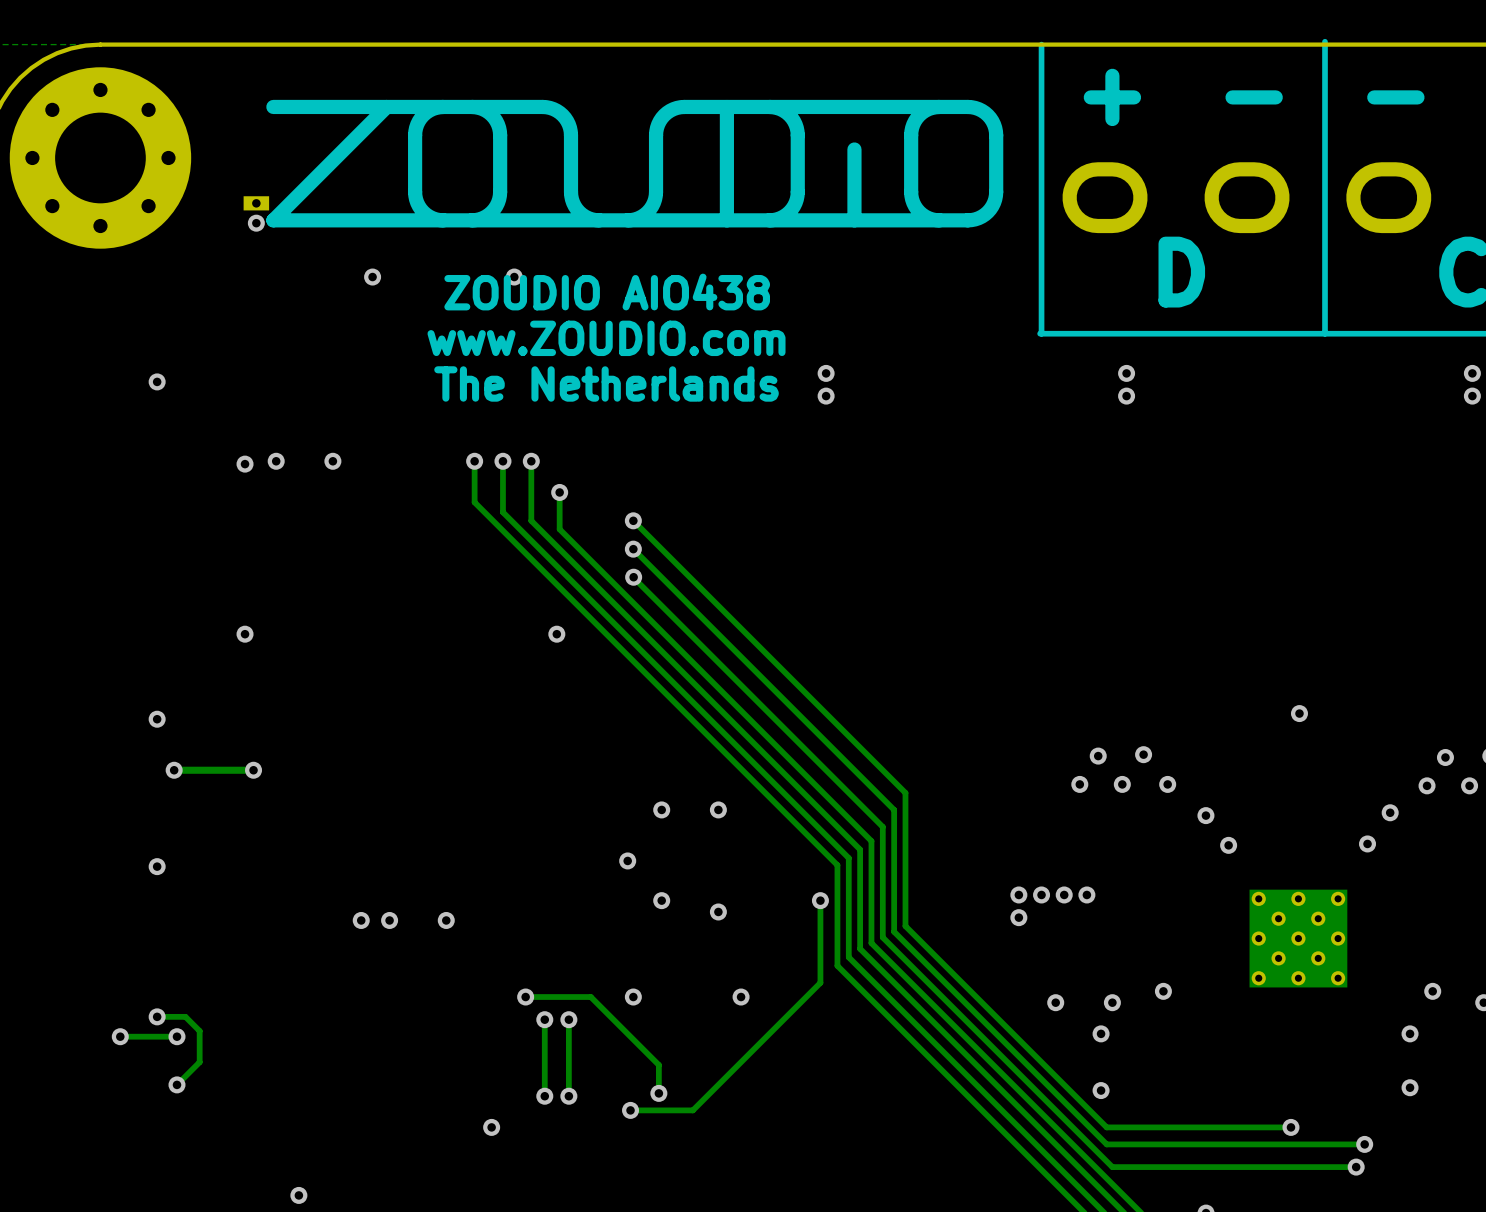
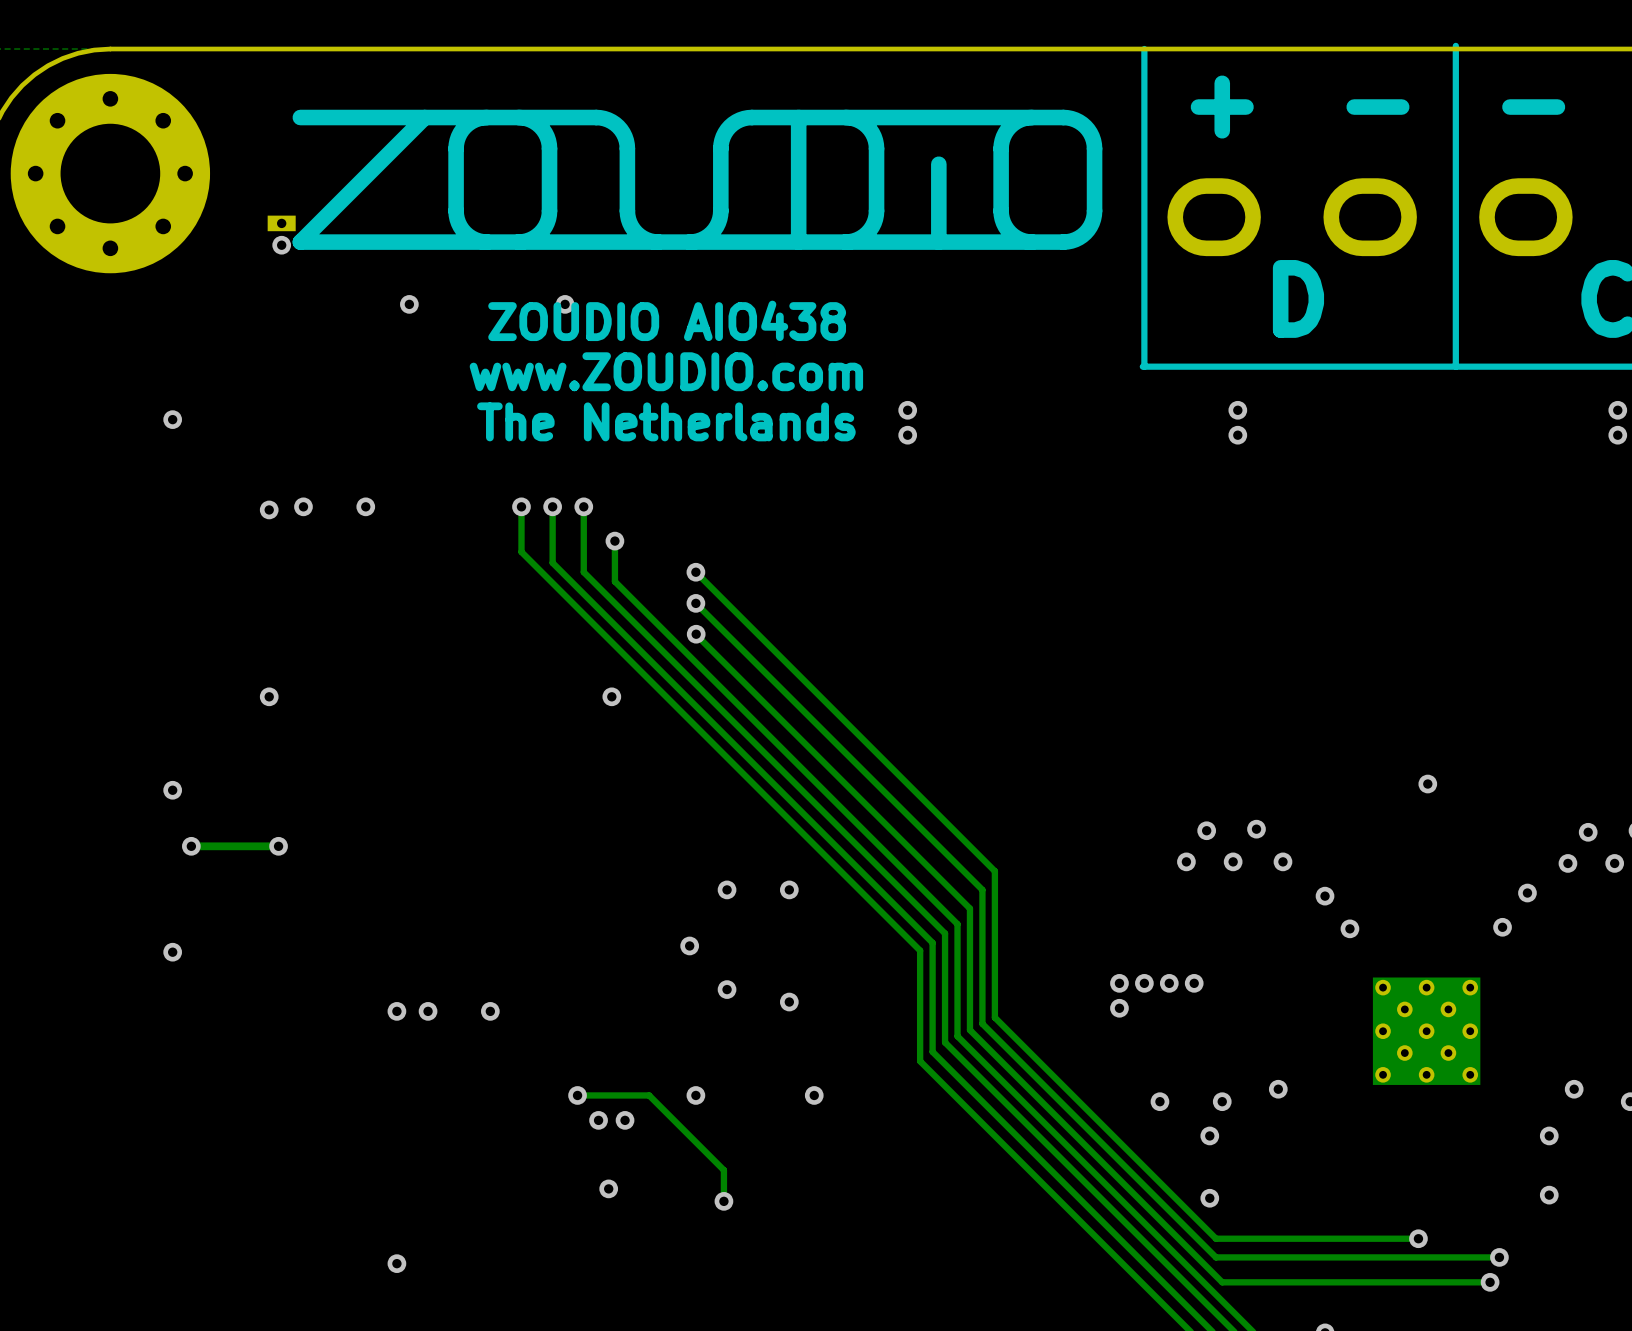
track: (820, 900) (820, 982) (692, 1110) (630, 1110) -> none
via: (820, 900) -> none
track: (157, 1016) (185, 1016) (199, 1031) (199, 1062) (176, 1084) -> none
via: (157, 1016) -> none
track: (544, 1019) (544, 1096) -> none
track: (568, 1019) (568, 1096) -> none
via: (120, 1036) -> none
track: (176, 1036) (120, 1036) -> none
via: (176, 1036) -> none
via: none -> (608, 1188)
via: (176, 1084) -> none
via: (544, 1096) -> none
via: (568, 1096) -> none
via: (630, 1110) -> none
via: (491, 1127) -> none
via: none -> (396, 1263)
via: (298, 1195) -> none

